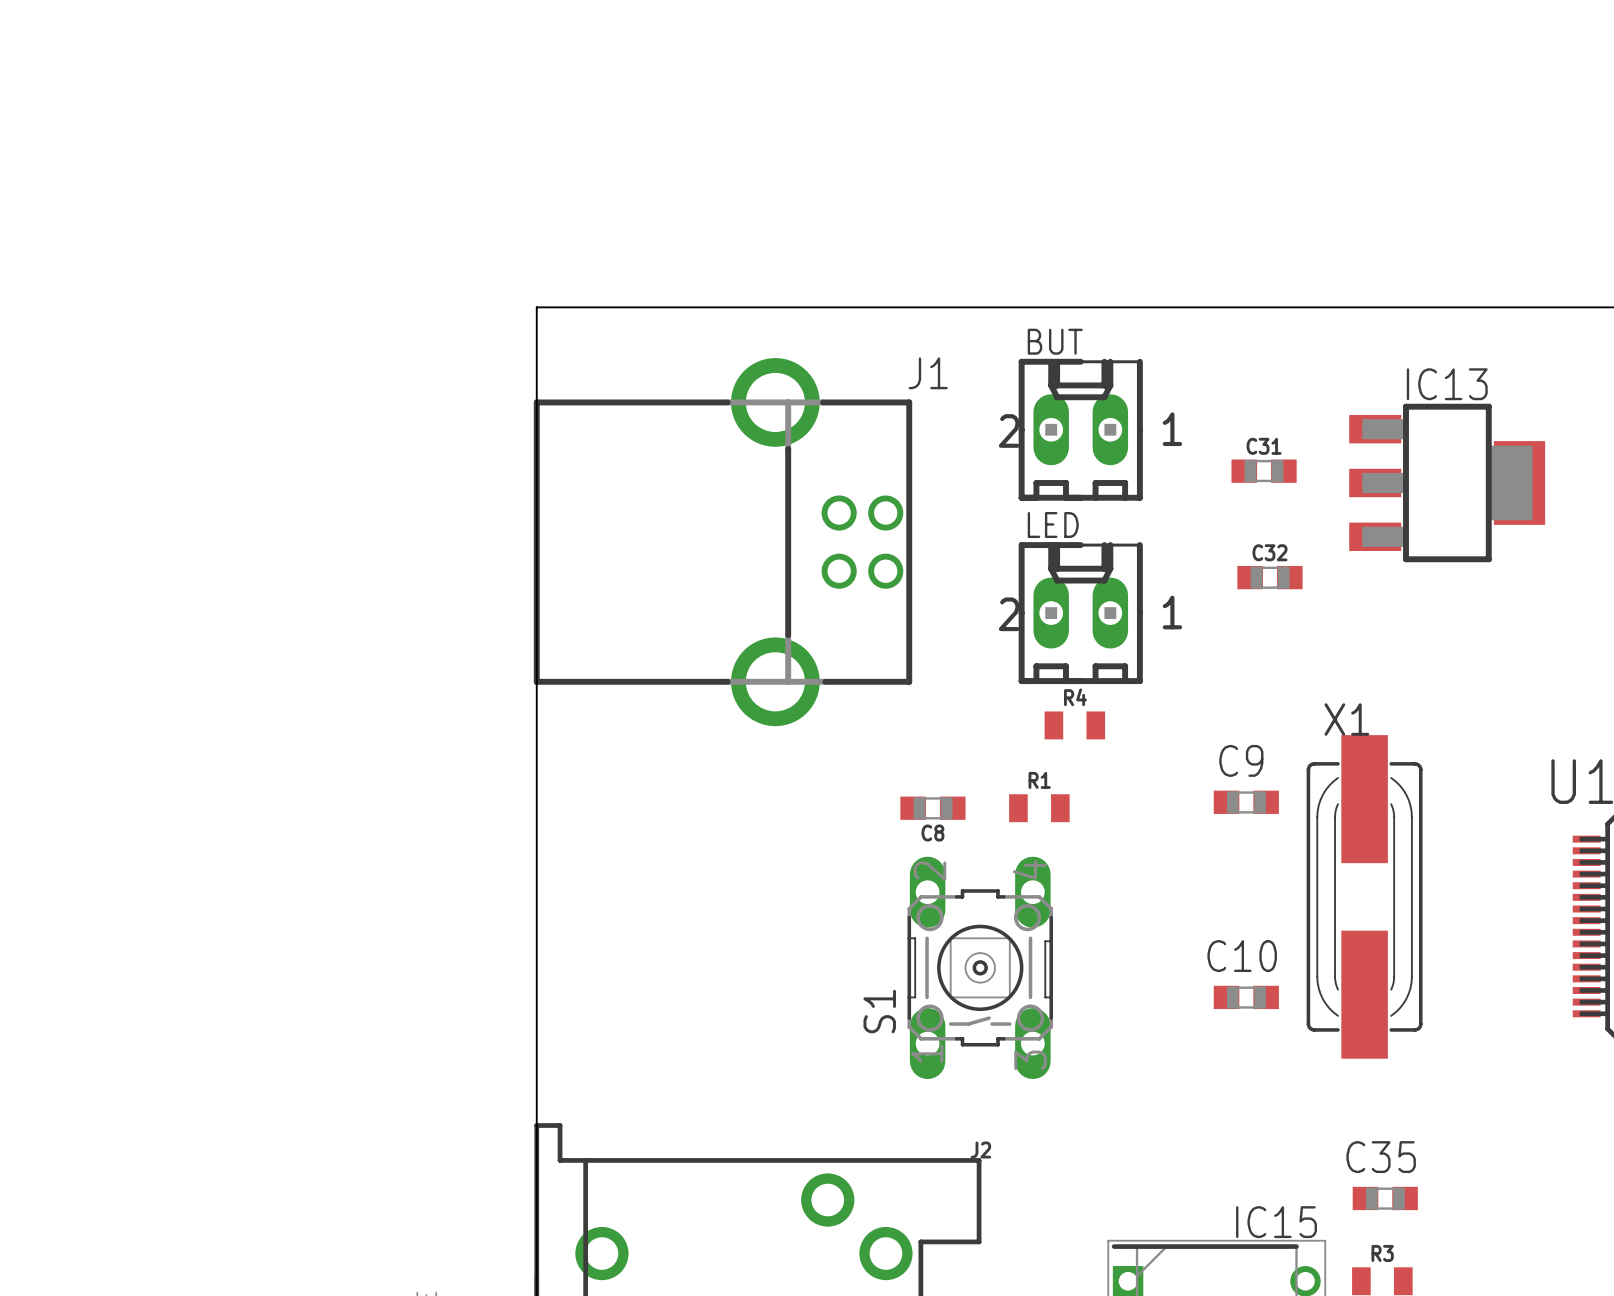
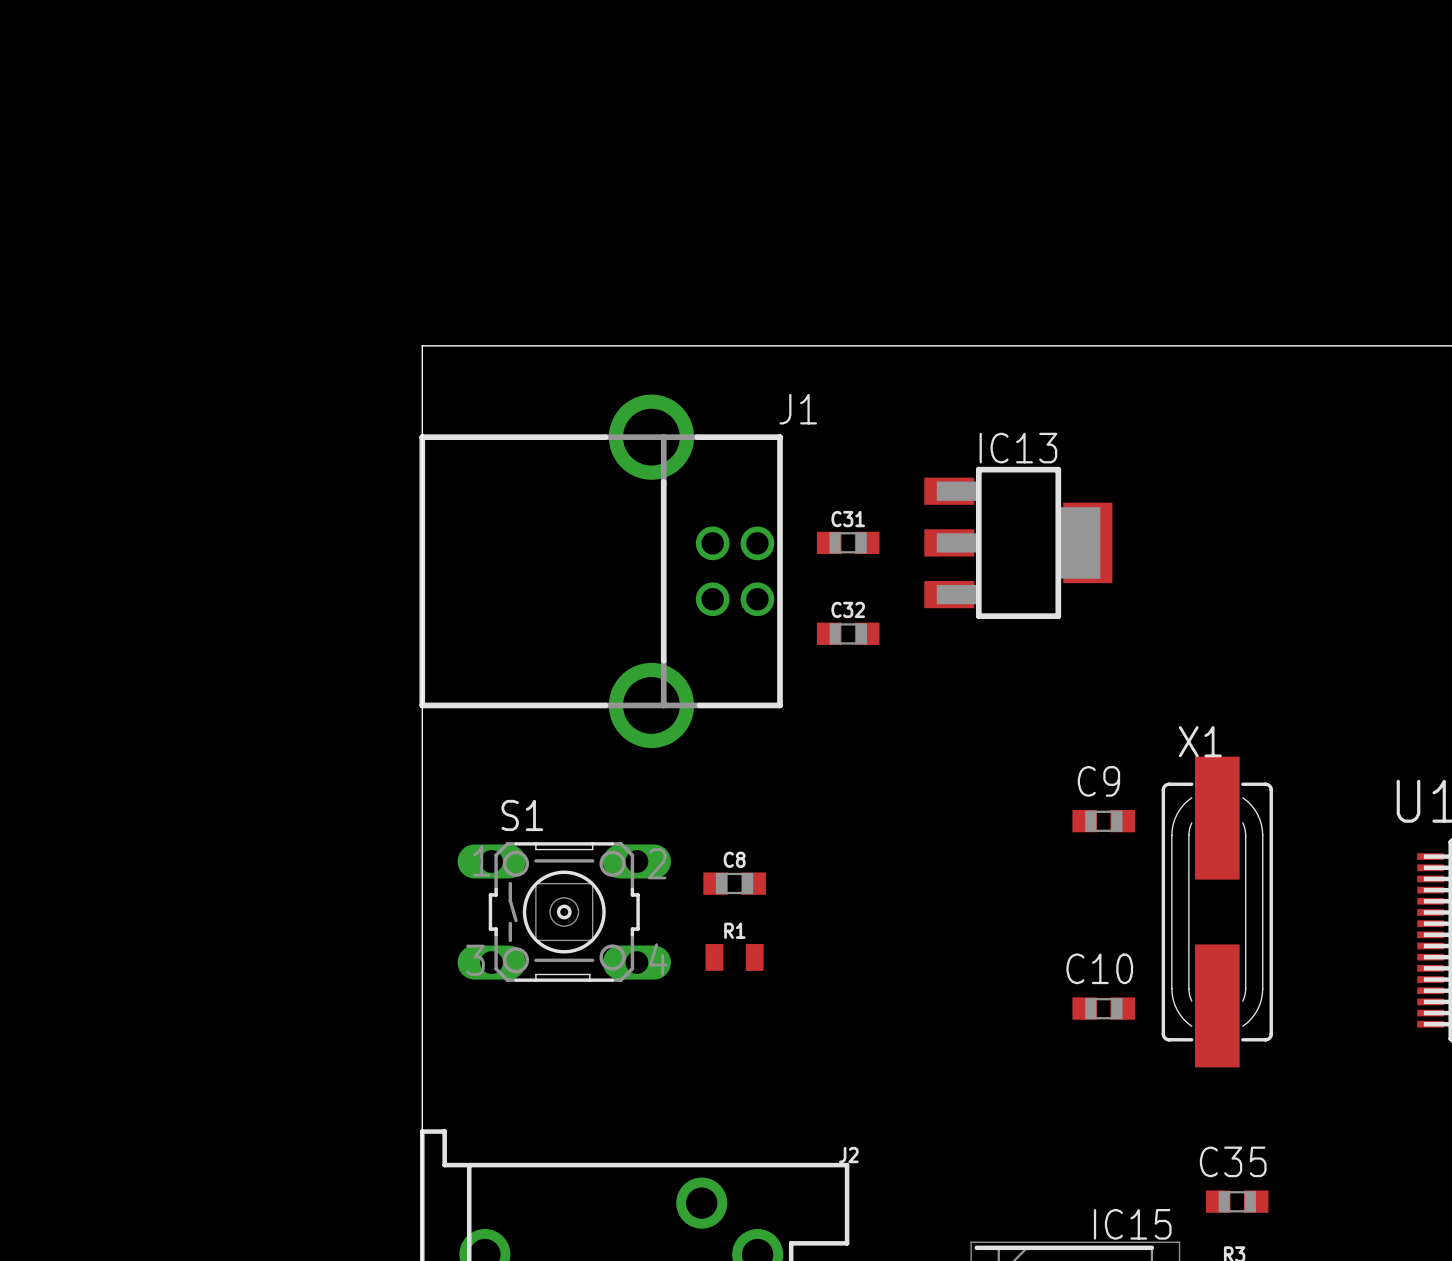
BUT: (1080, 429) -> none
C31 position: (1264, 471) -> (848, 542)
IC13 position: (1447, 482) -> (1018, 542)
C32 position: (1269, 577) -> (848, 633)
LED: (1080, 613) -> none
R4: (1074, 725) -> none
C8 position: (932, 808) -> (734, 883)
R1 position: (1039, 808) -> (734, 957)
C8 name position: C8 (932, 833) -> C8 (734, 859)
S1 rotation: 0° (980, 967) -> 90° clockwise (564, 912)
S1 position: (980, 967) -> (564, 912)

